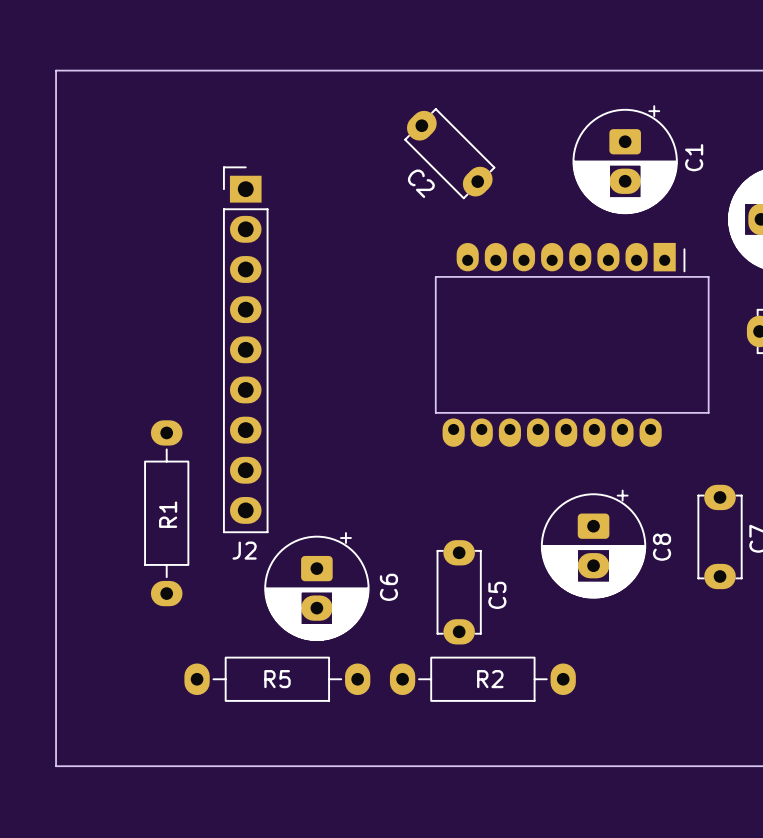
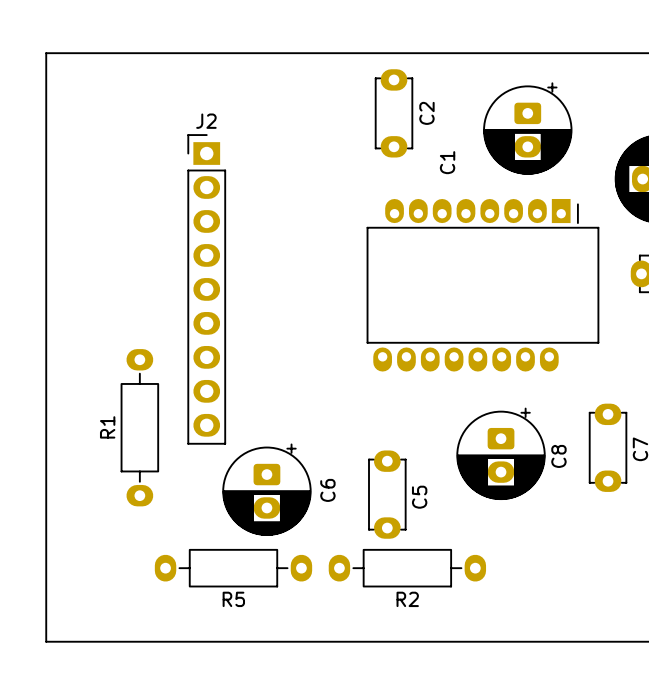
C2 rotation: 0° (449, 153) -> 45° clockwise (394, 113)
C1 name position: C1 (694, 157) -> C1 (447, 162)
C2 name position: C2 (421, 183) -> C2 (426, 113)
R1 name position: R1 (168, 514) -> R1 (107, 427)
J2 name position: J2 (244, 550) -> J2 (206, 121)
R5 name position: R5 (277, 679) -> R5 (233, 599)
R2 name position: R2 (490, 679) -> R2 (407, 599)

